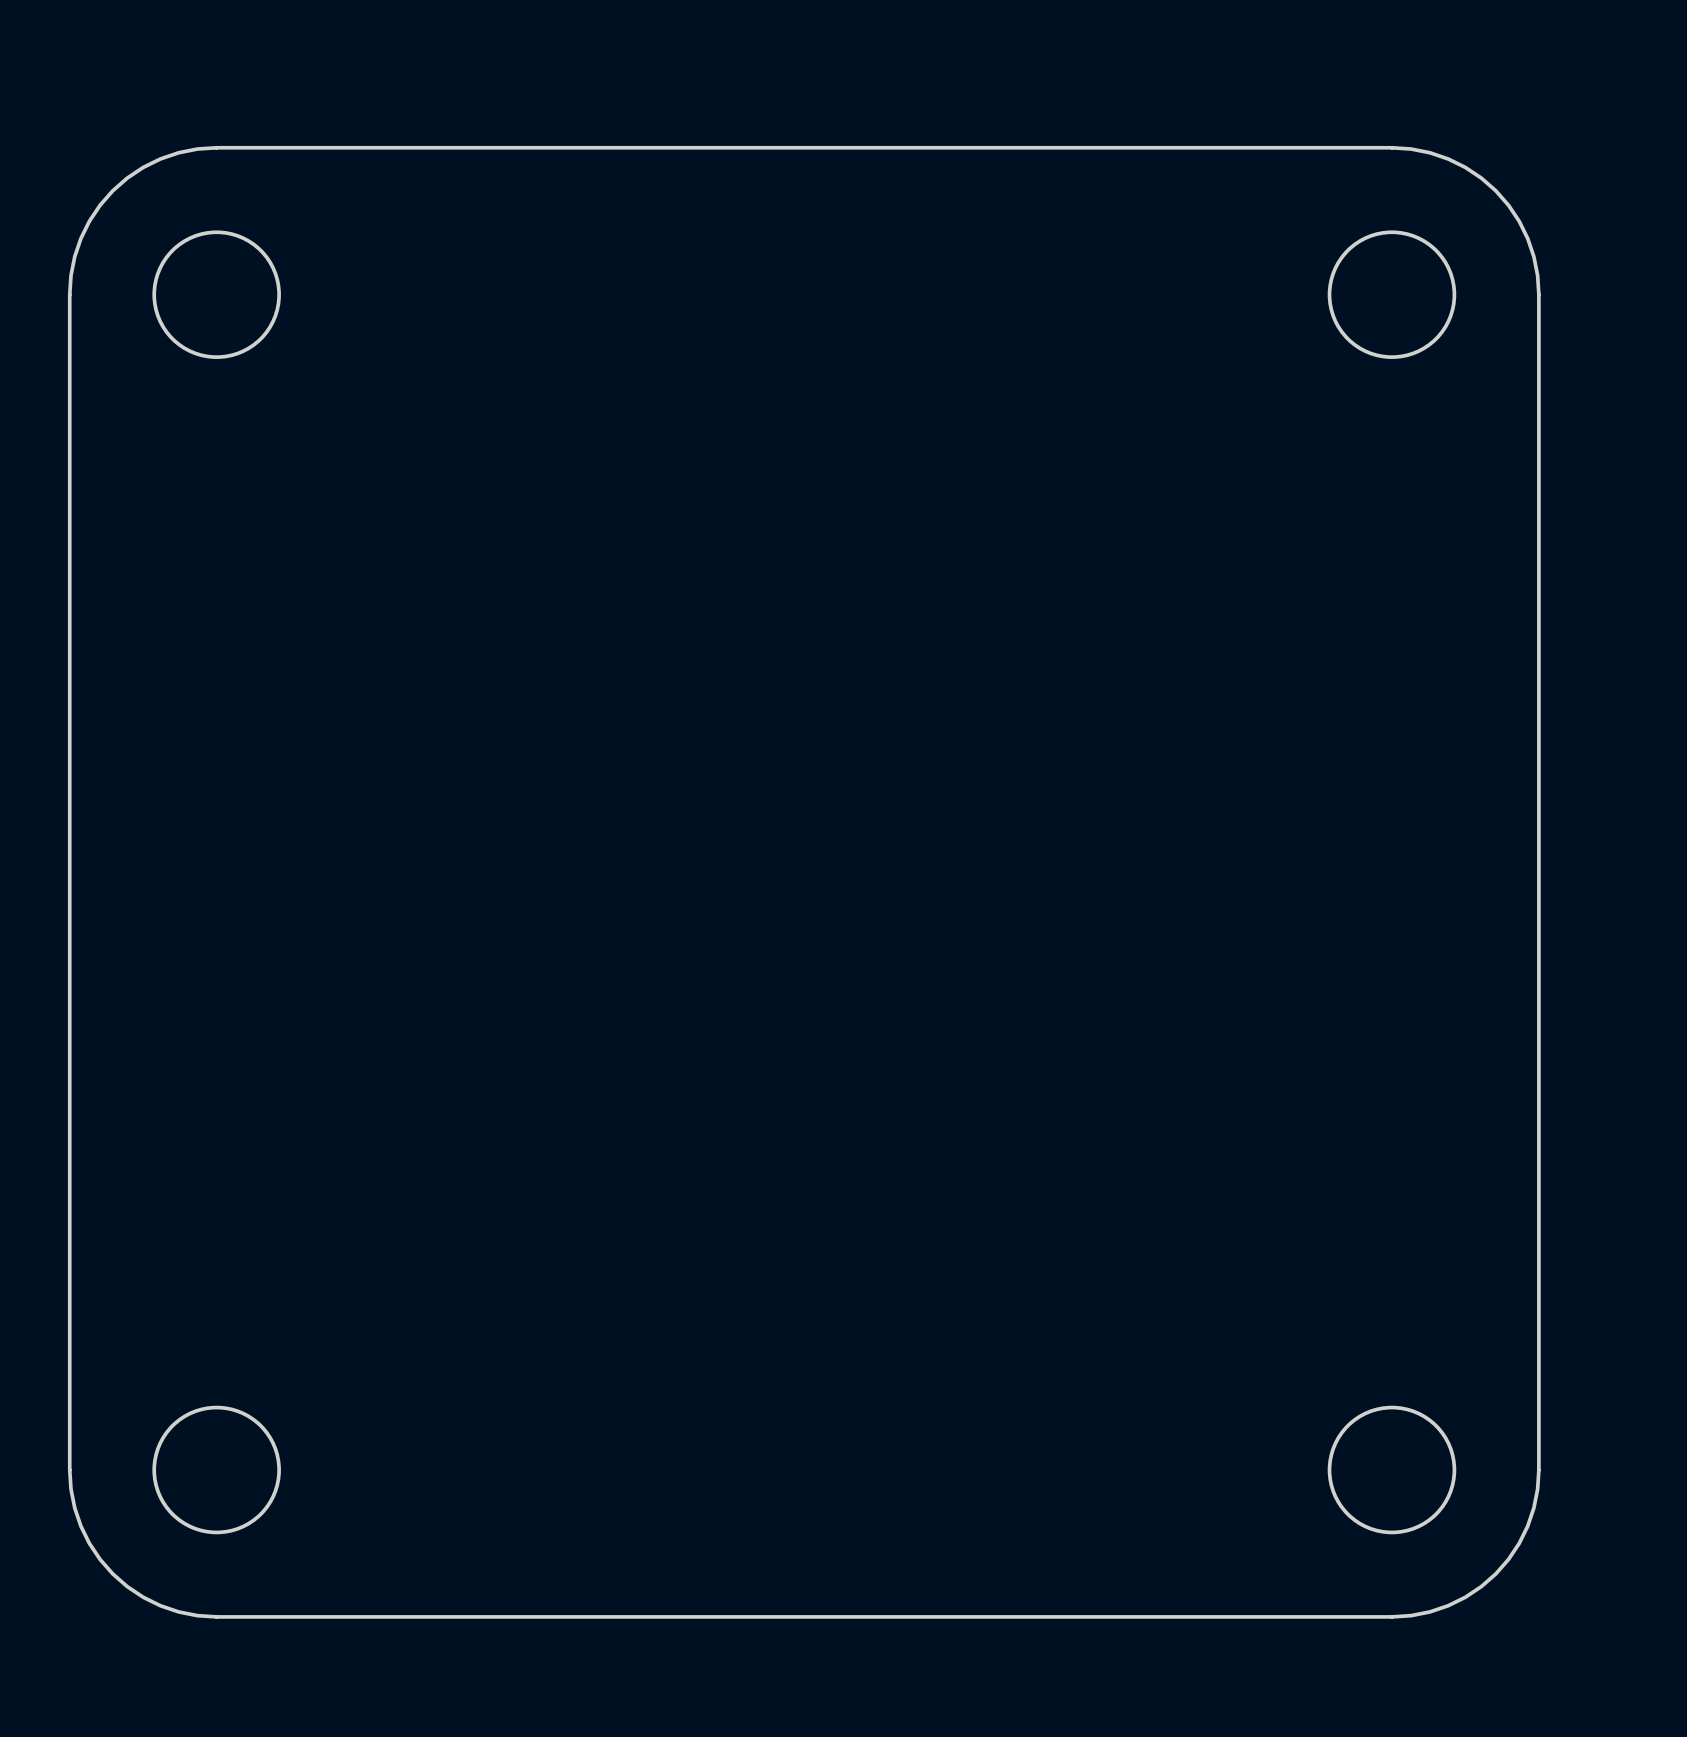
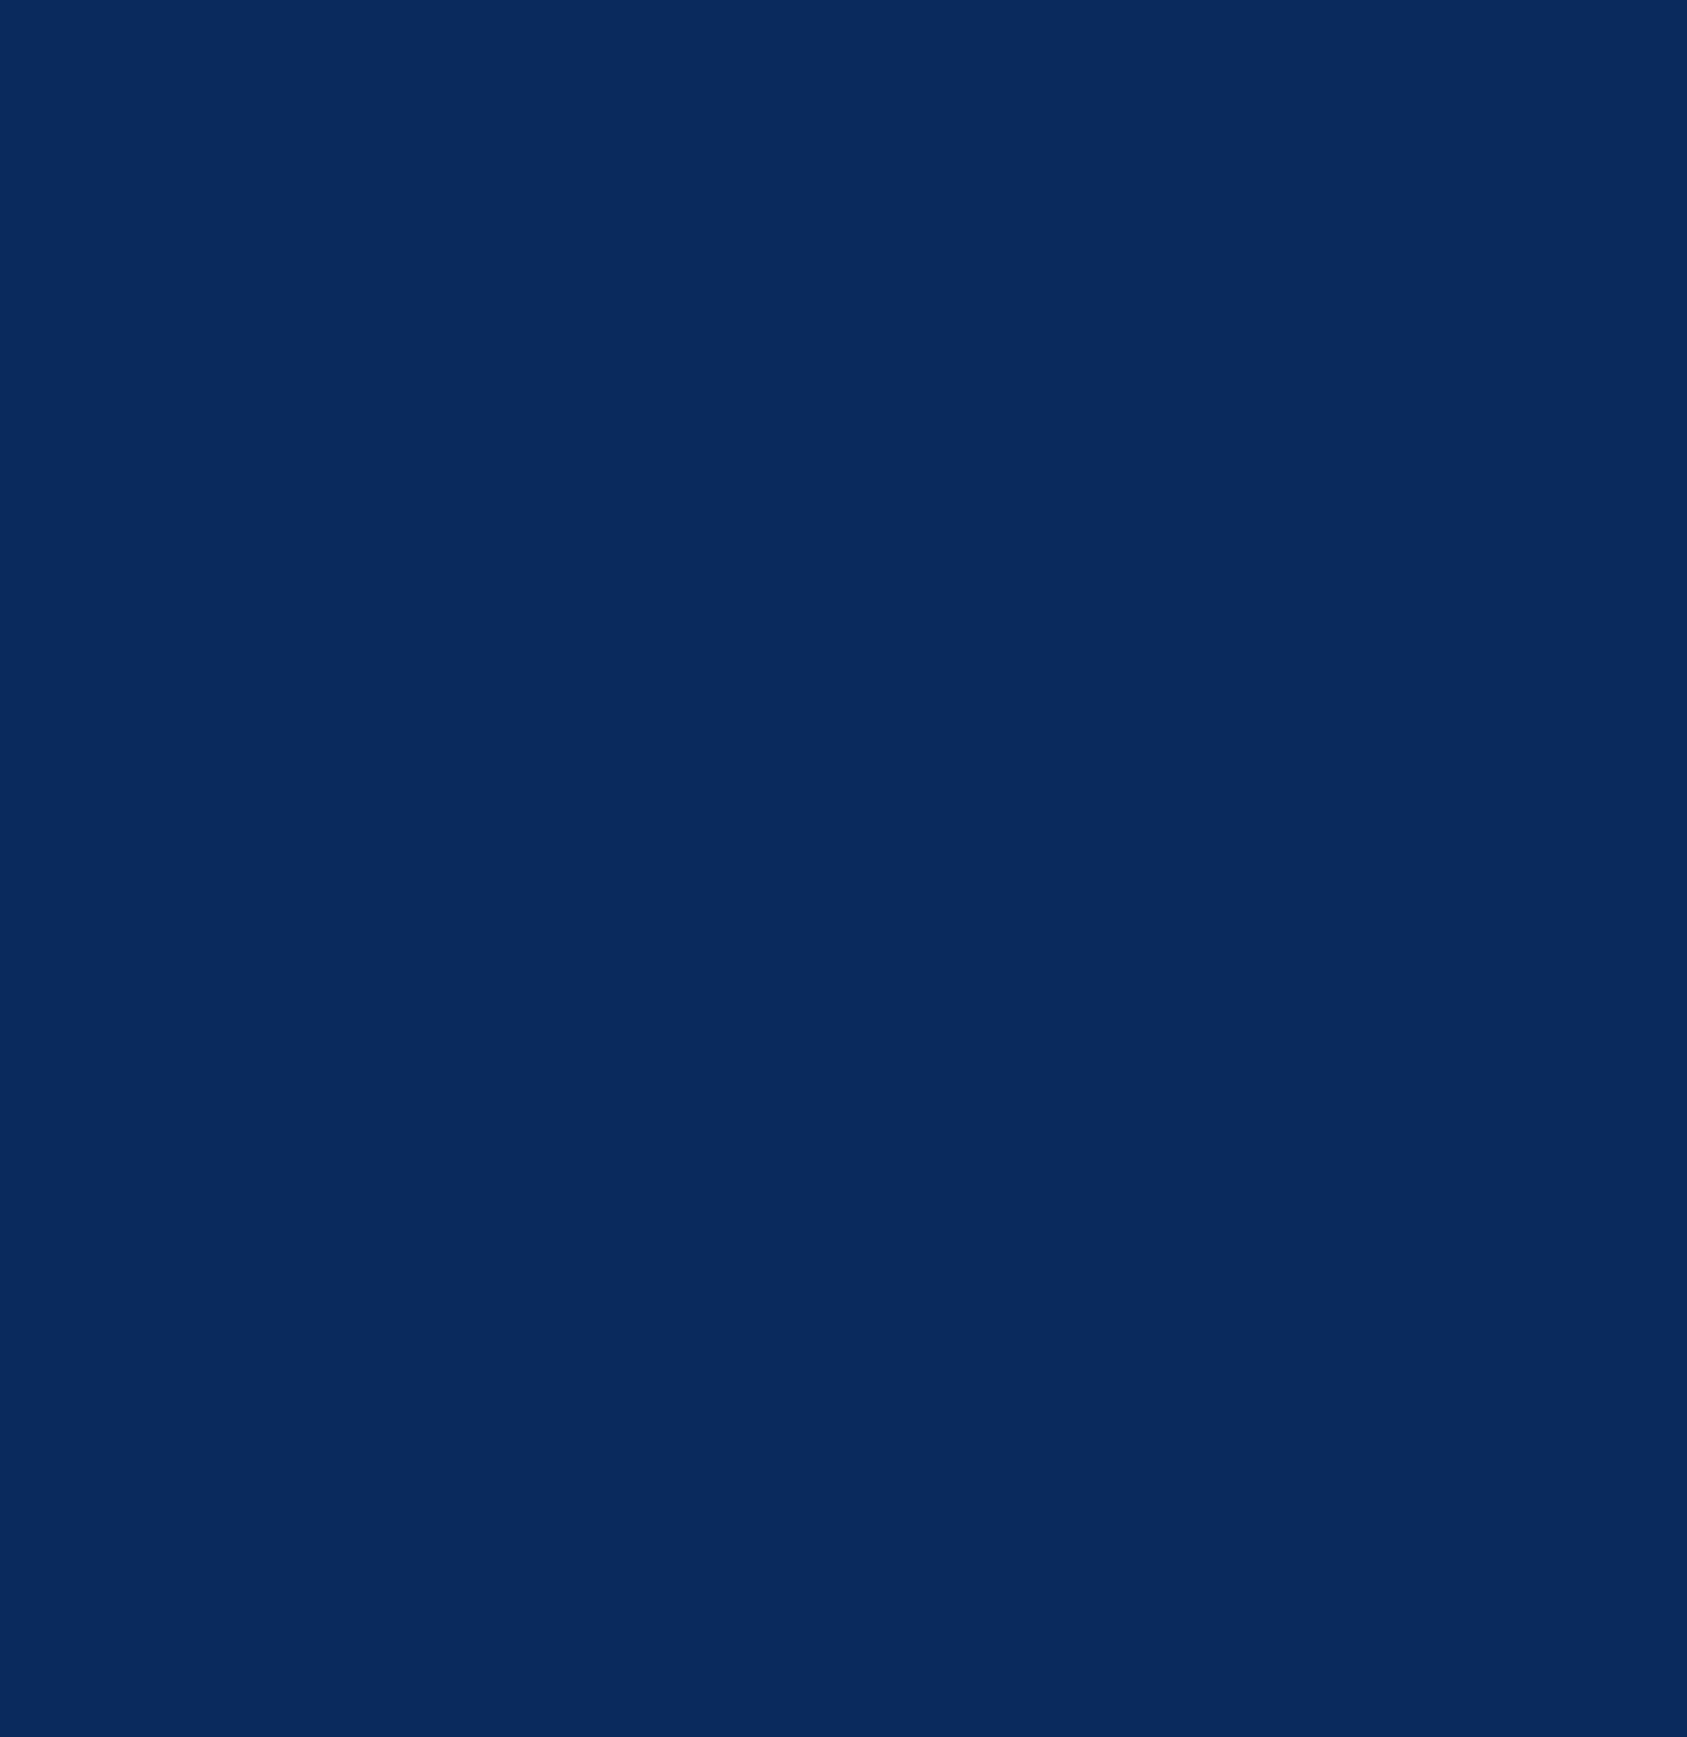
board edge: (1391, 147) (216, 147) (178, 152) (160, 158) (127, 178) (112, 190) (100, 205) (80, 238) (74, 256) (69, 294) (69, 1470) (71, 1489) (80, 1526) (100, 1559) (112, 1573) (127, 1586) (160, 1605) (178, 1611) (216, 1616) (1391, 1616) (1411, 1615) (1448, 1605) (1481, 1586) (1495, 1573) (1519, 1543) (1527, 1526) (1537, 1489) (1538, 1470) (1537, 275) (1527, 238) (1519, 221) (1495, 190) (1481, 178) (1448, 158) (1429, 152) (1391, 147) -> none
round board edge: [152, 230, 281, 359] -> none
round board edge: [1327, 230, 1457, 359] -> none
round board edge: [152, 1405, 281, 1535] -> none
round board edge: [1327, 1405, 1457, 1535] -> none

